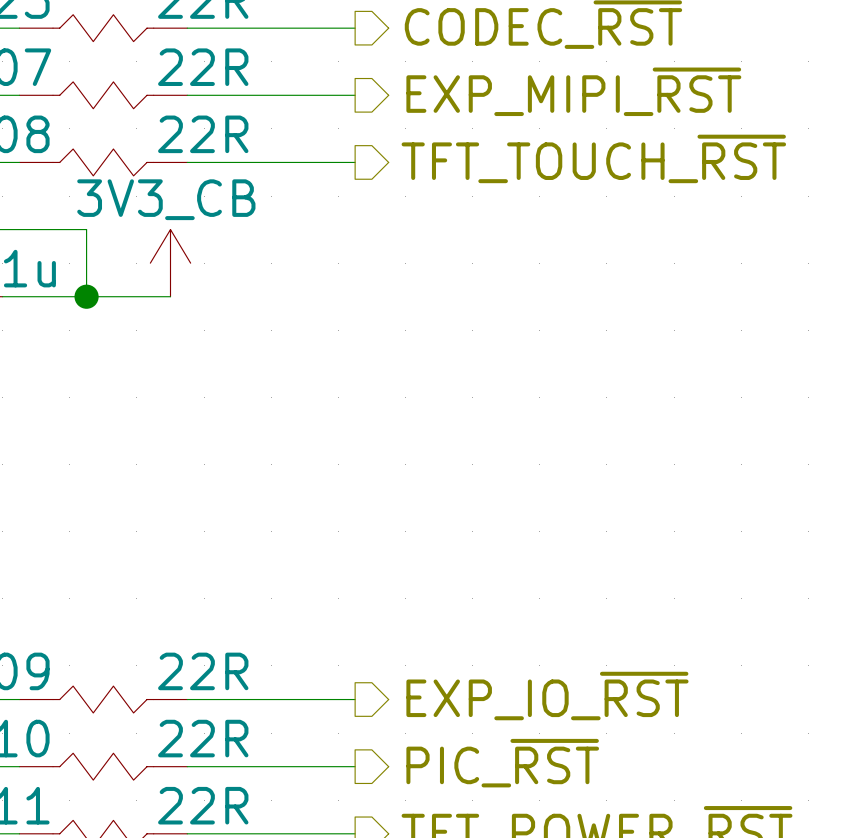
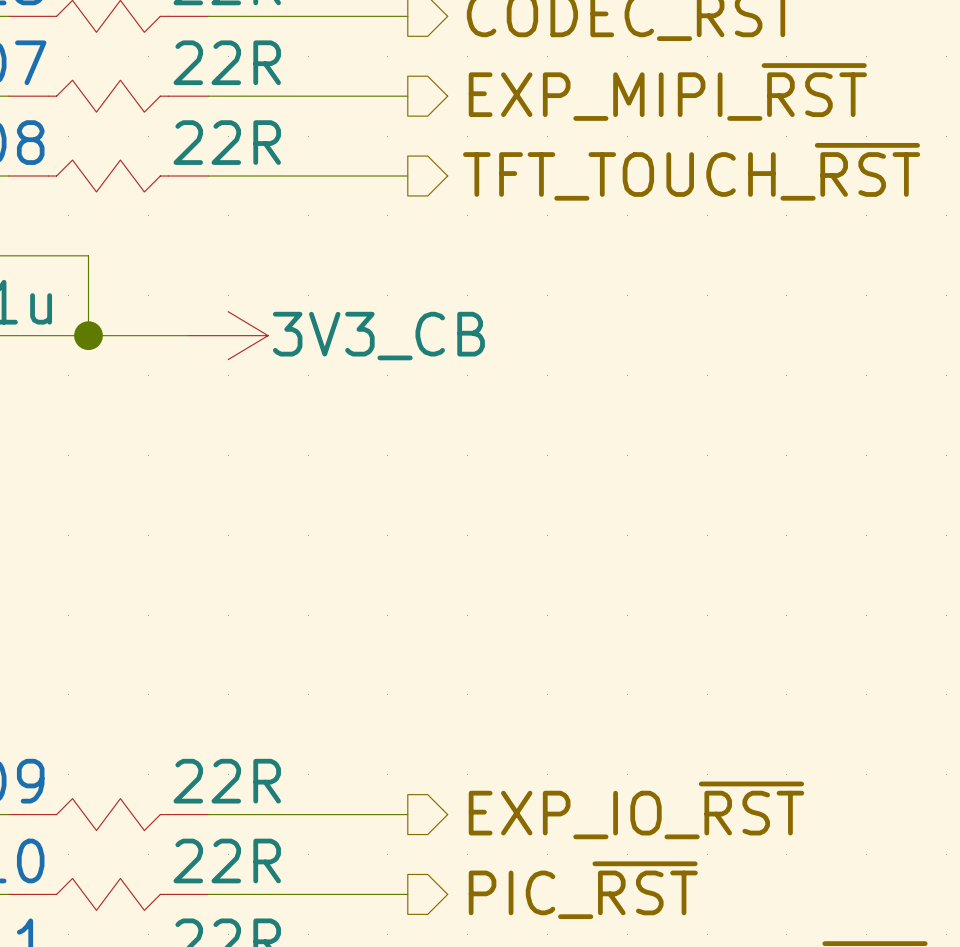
power symbol text position: 3V3_CB (166, 199) -> 3V3_CB (378, 336)
power symbol rotation: 0° (170, 263) -> 90° clockwise (228, 335)
power symbol position: 3V3_CB (170, 263) -> 3V3_CB (228, 335)

